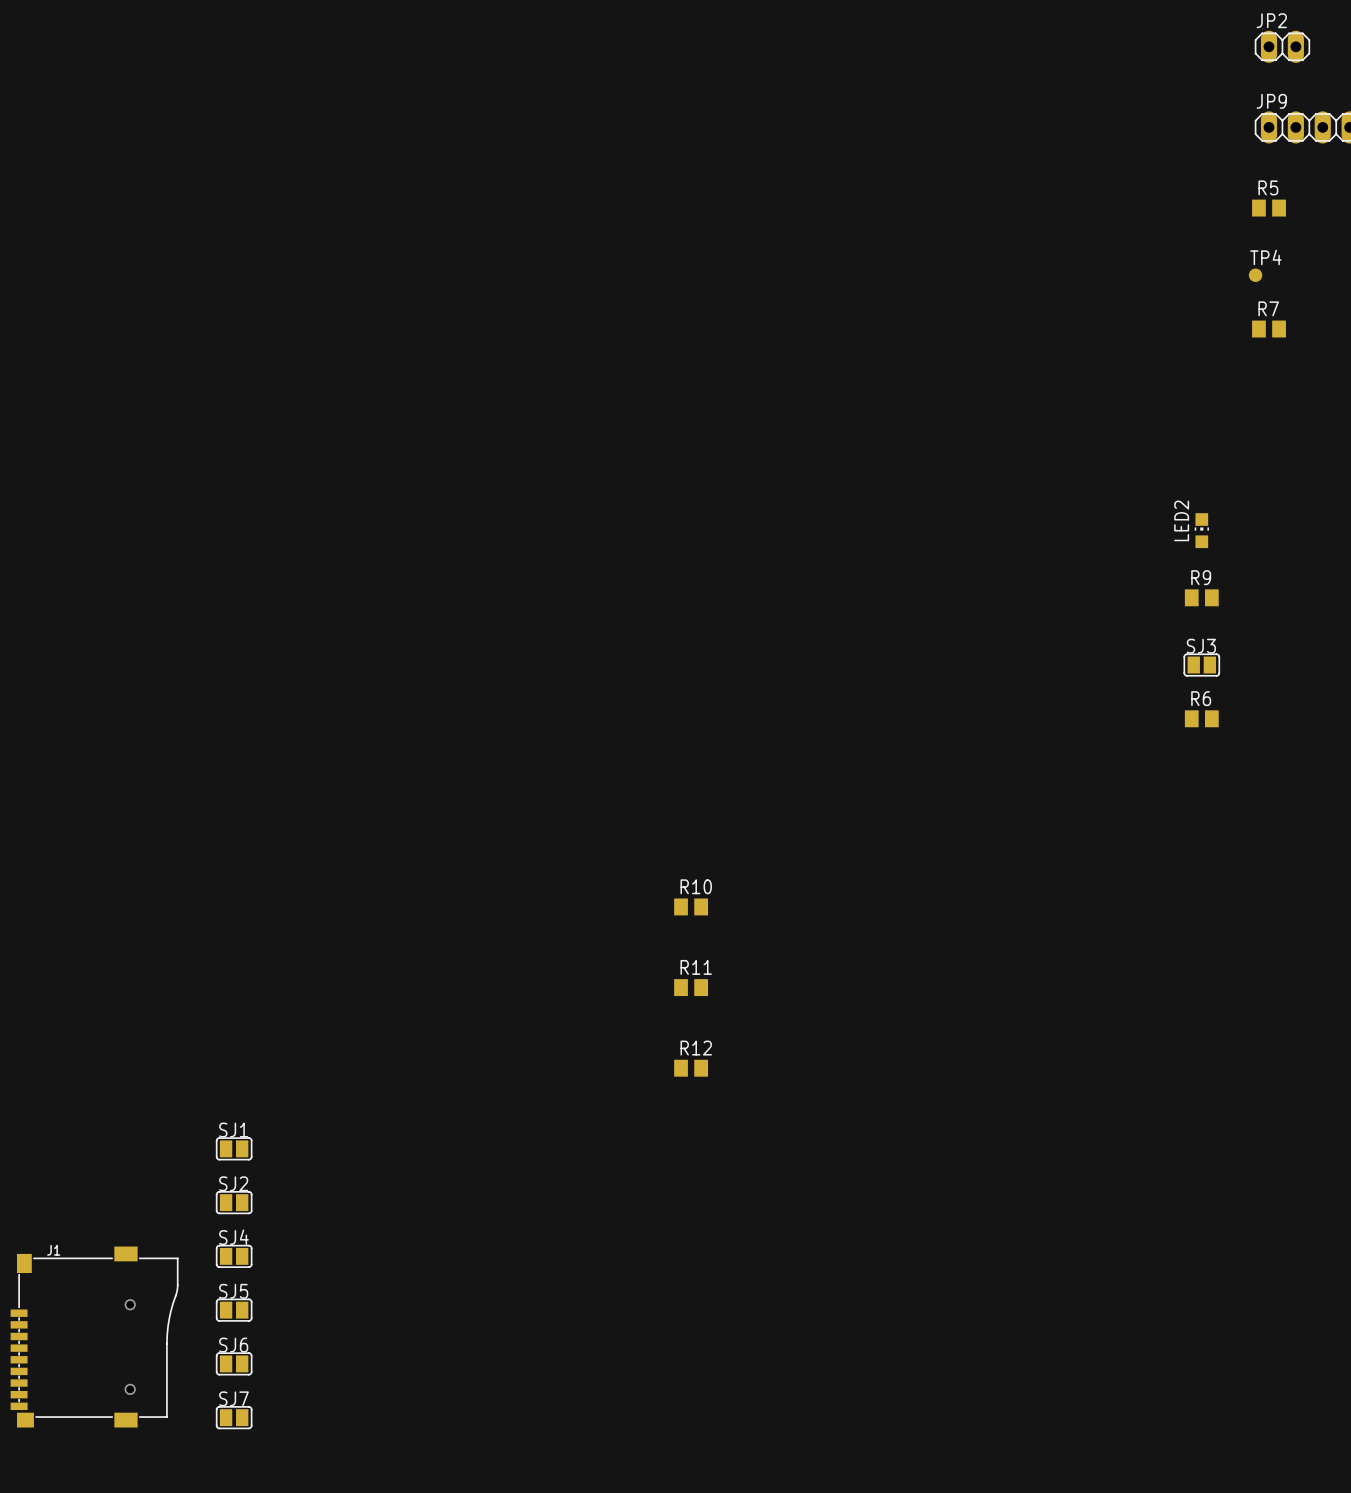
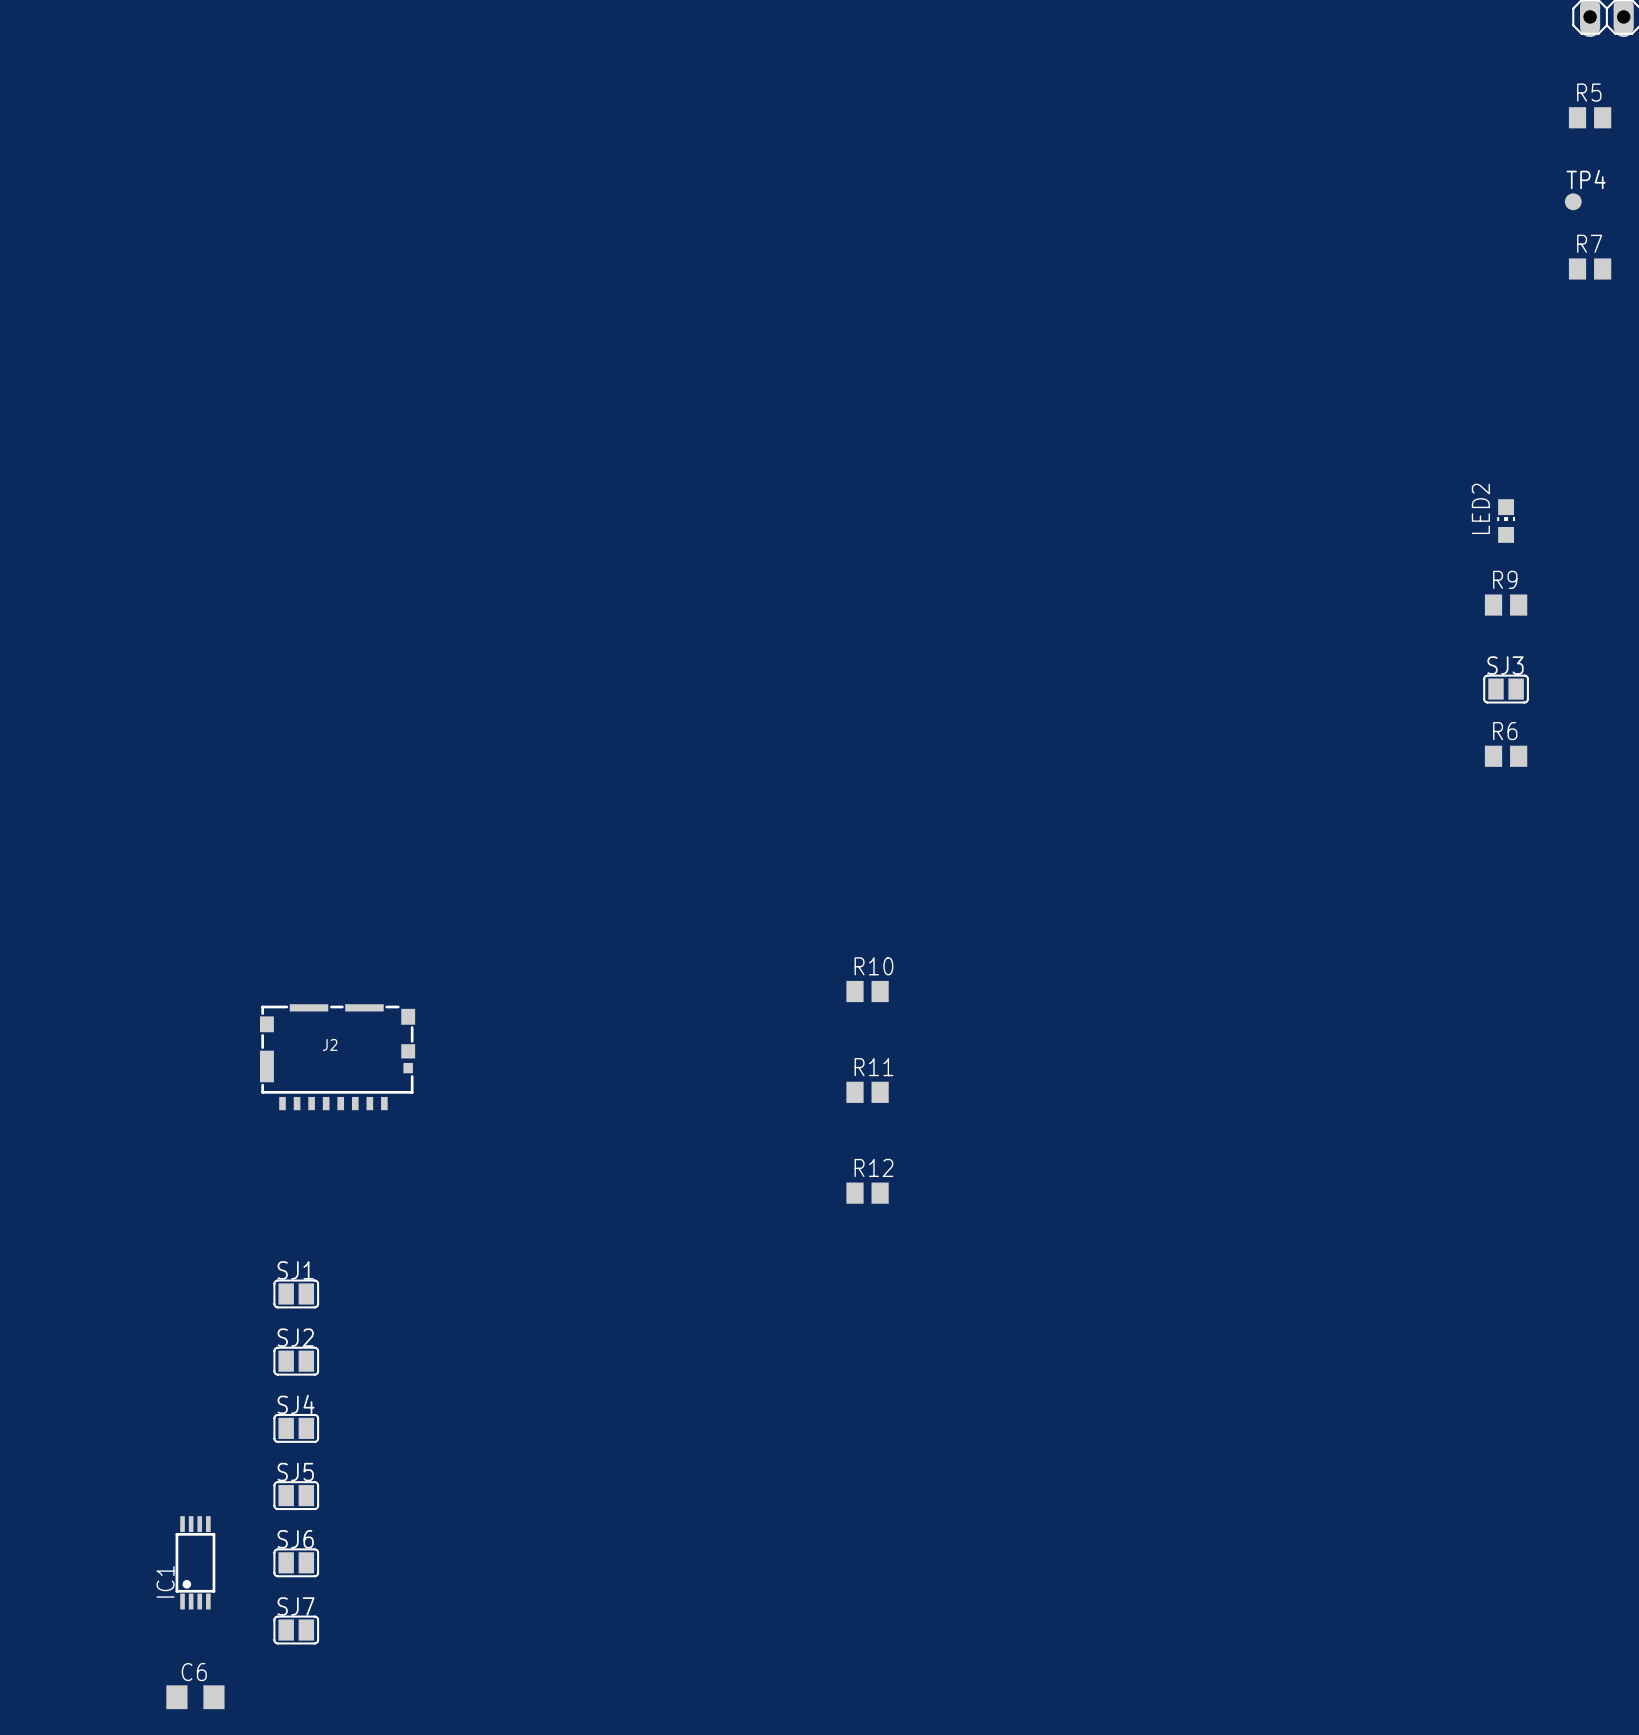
J2: none -> (337, 1057)
J1: (94, 1337) -> none
IC1: none -> (195, 1562)
C6: none -> (195, 1697)

